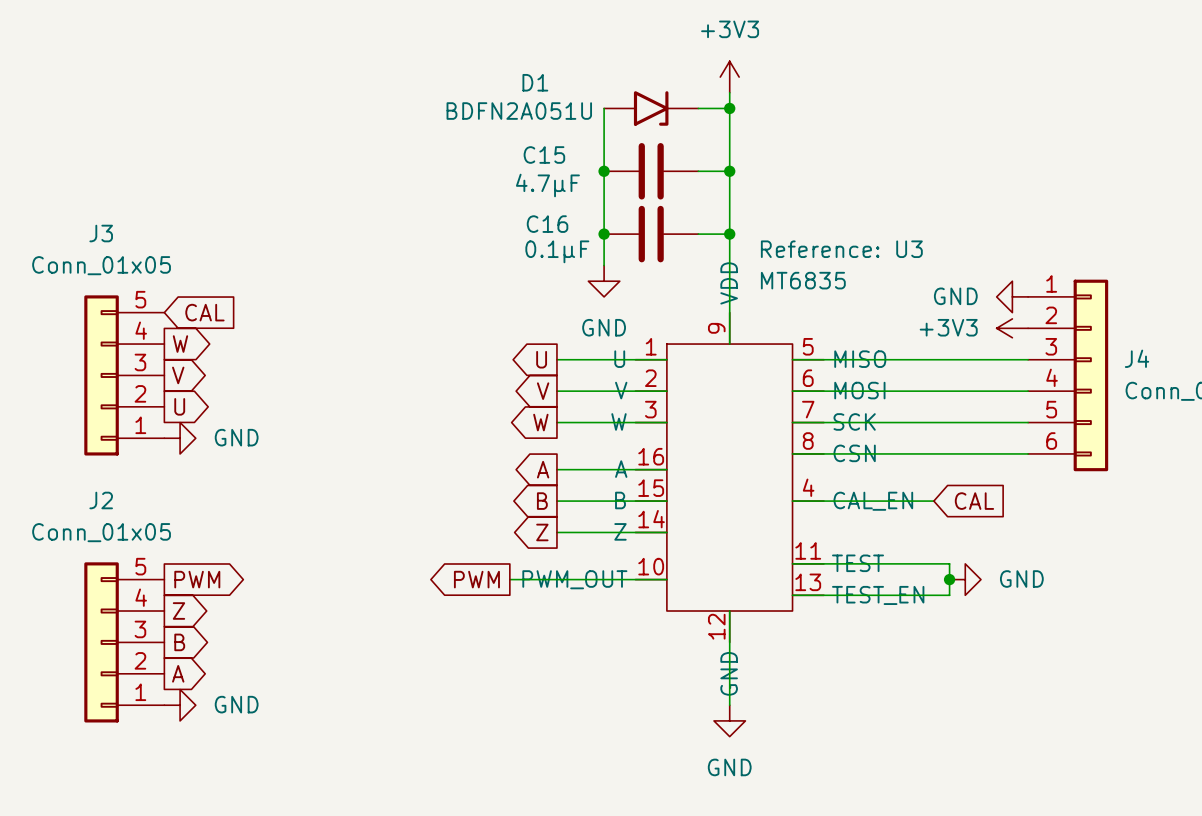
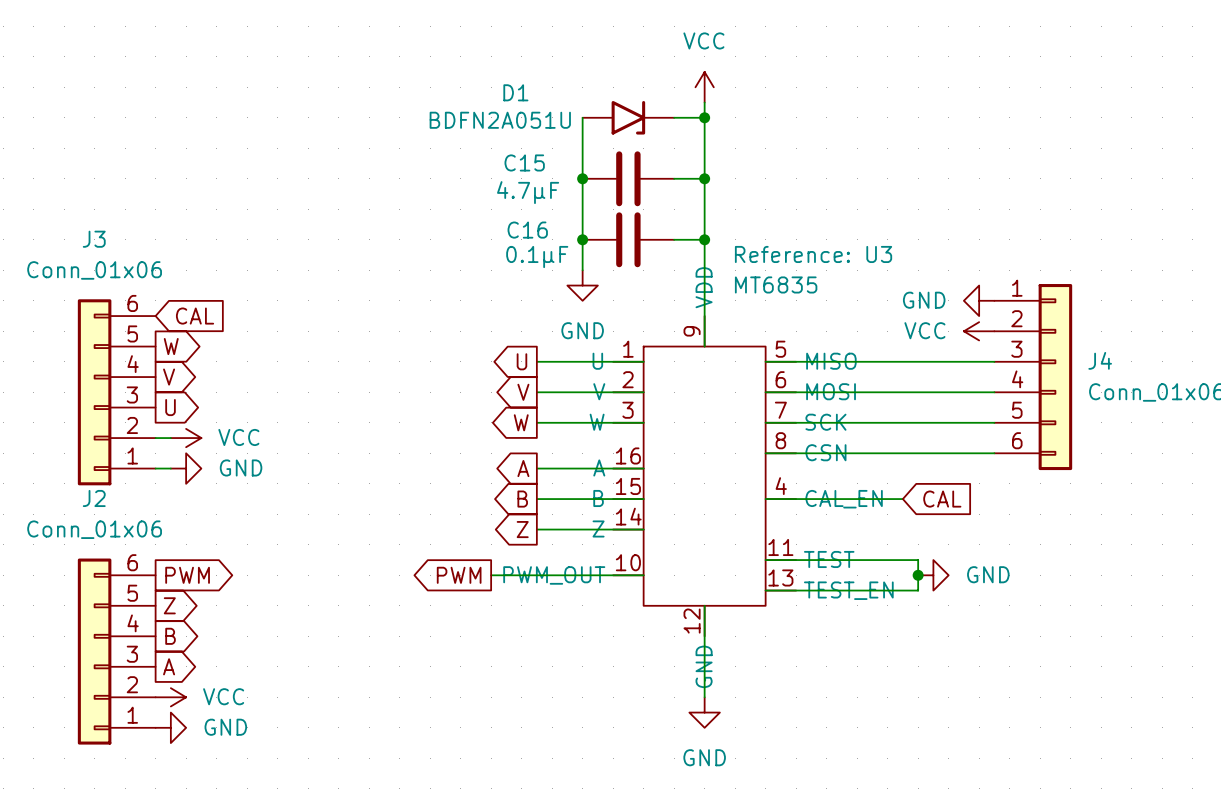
power symbol: +3V3 (729, 77) -> VCC (704, 87)
J3 value: Conn_01x05 (101, 265) -> Conn_01x06 (94, 270)
J3 symbol: [84, 295, 165, 456] -> [77, 299, 156, 486]
power symbol: +3V3 (1012, 328) -> VCC (979, 331)
power symbol position: GND (180, 438) -> GND (186, 468)
power symbol: none -> VCC (186, 438)
wire: none -> (155, 468) (170, 468)
J2 value: Conn_01x05 (101, 532) -> Conn_01x06 (94, 529)
J2 symbol: [84, 562, 165, 723] -> [77, 558, 156, 745]
power symbol: GND (180, 705) -> VCC (170, 697)
power symbol: none -> GND (170, 727)

